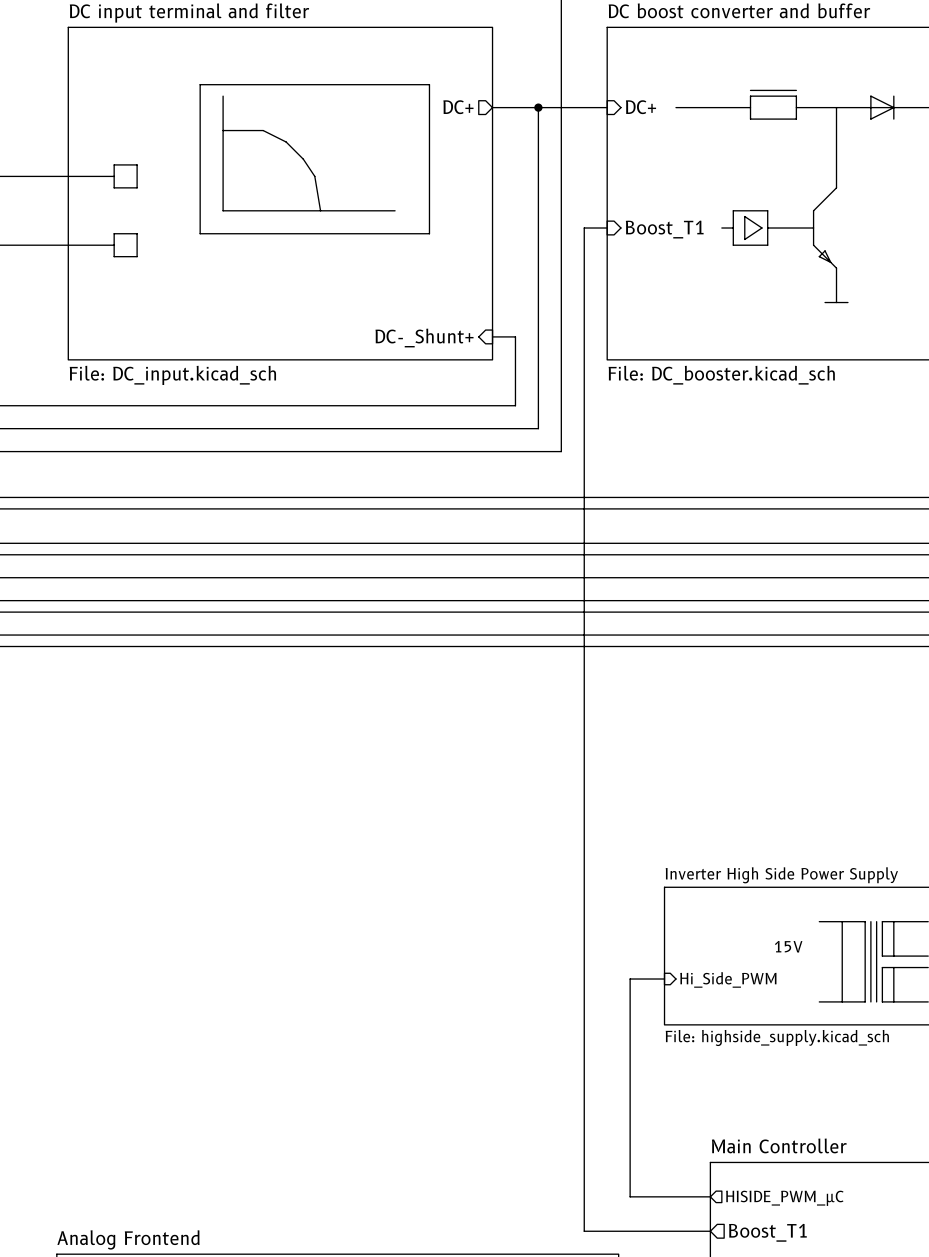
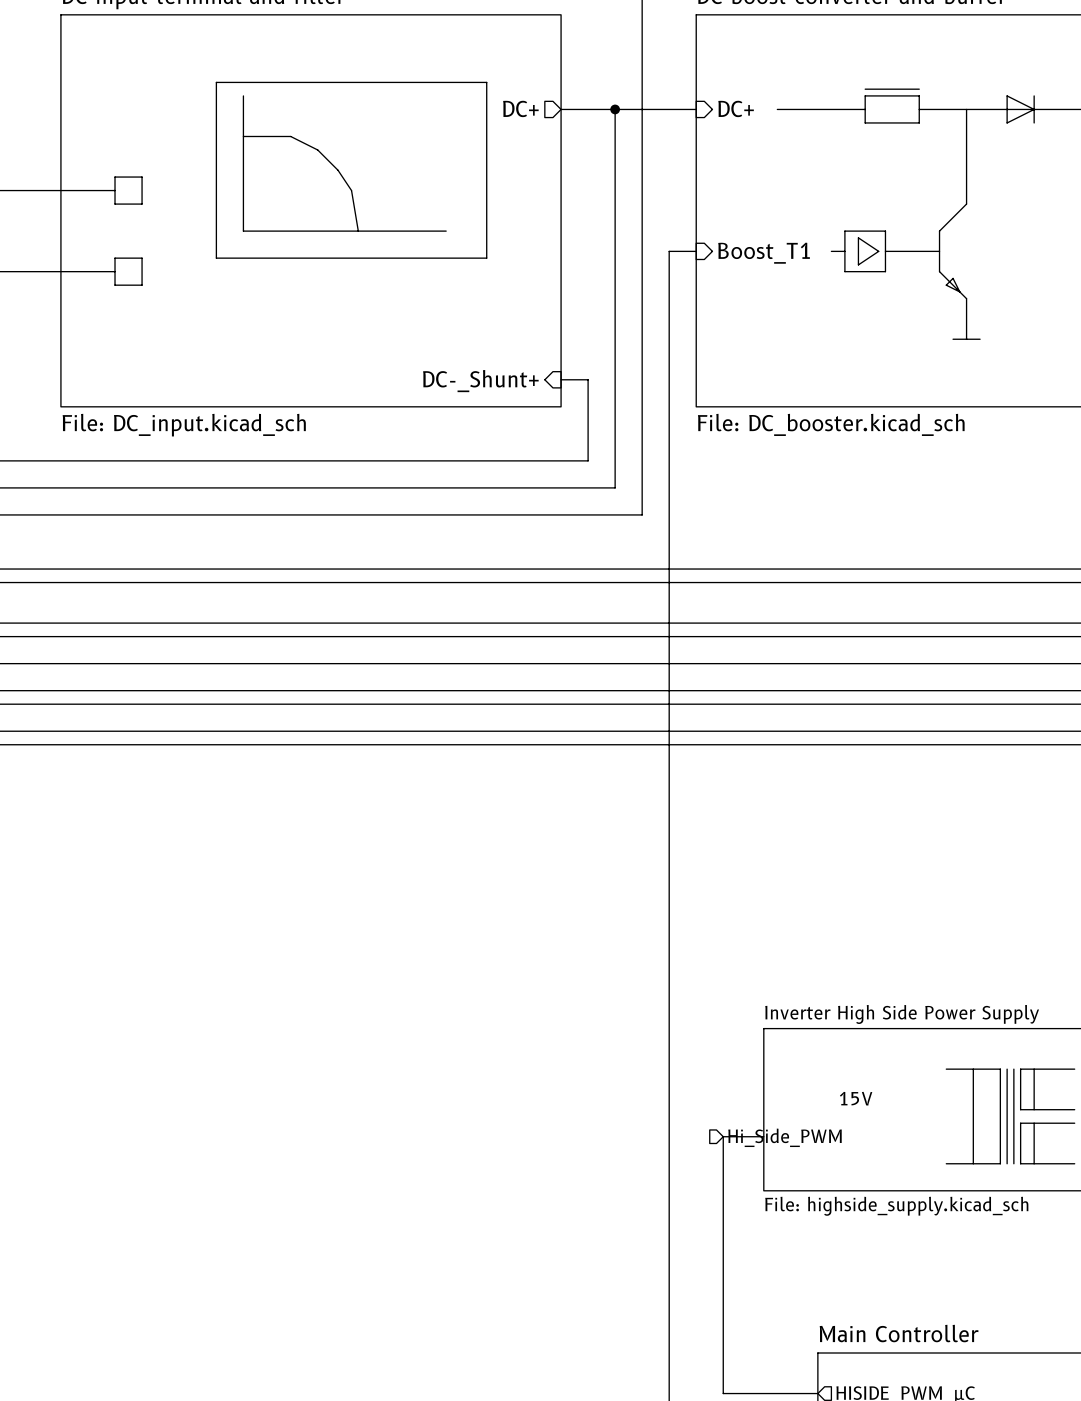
text position: 15V (788, 946) -> 15V (856, 1098)
sheet pin position: Hi_Side_PWM (728, 979) -> Hi_Side_PWM (784, 1137)

